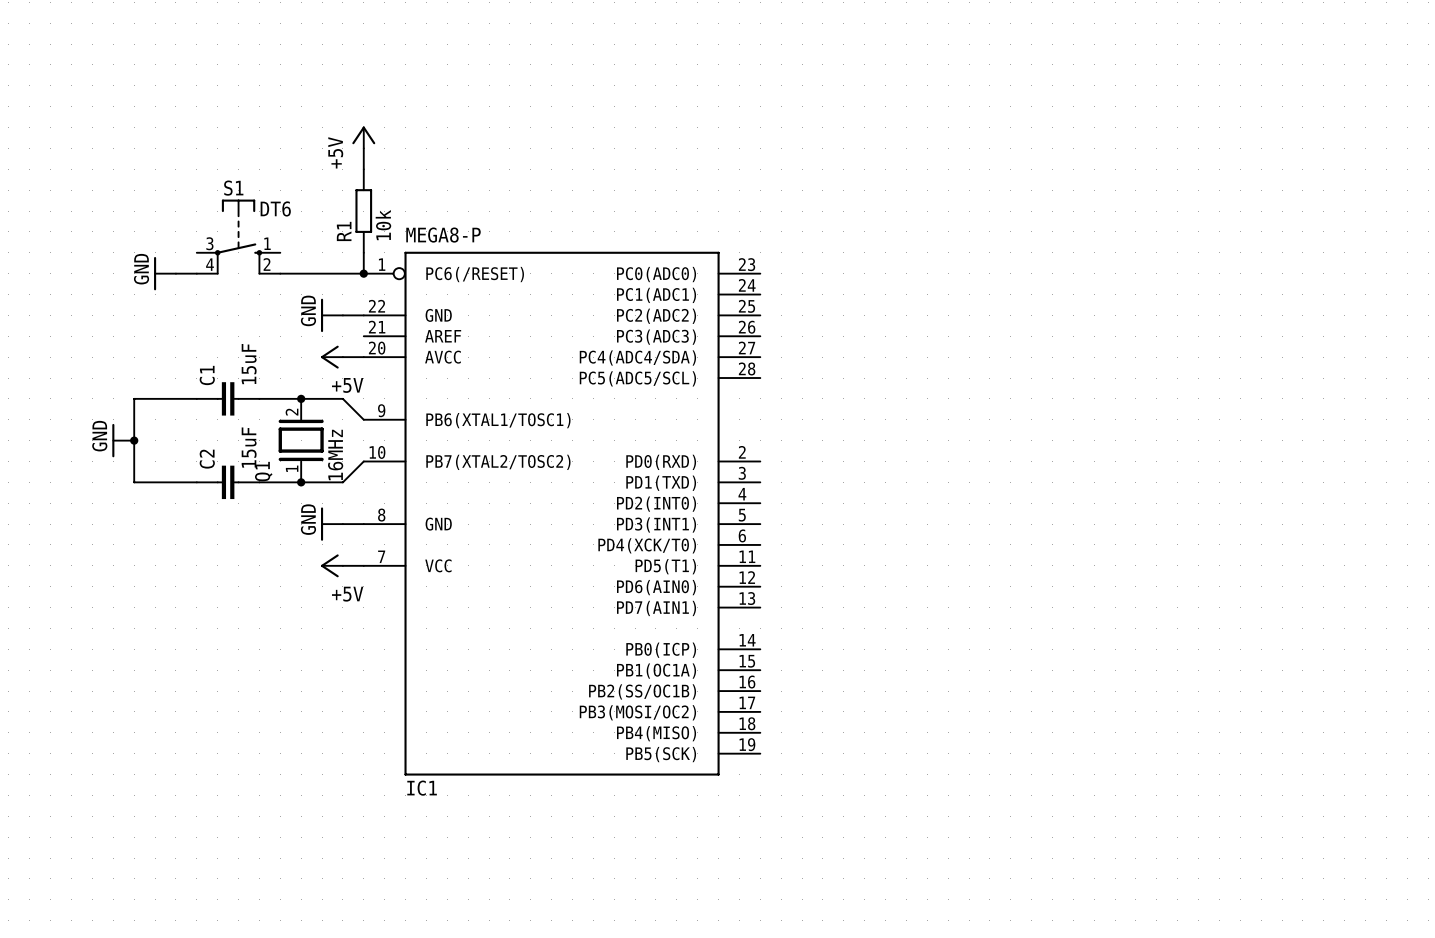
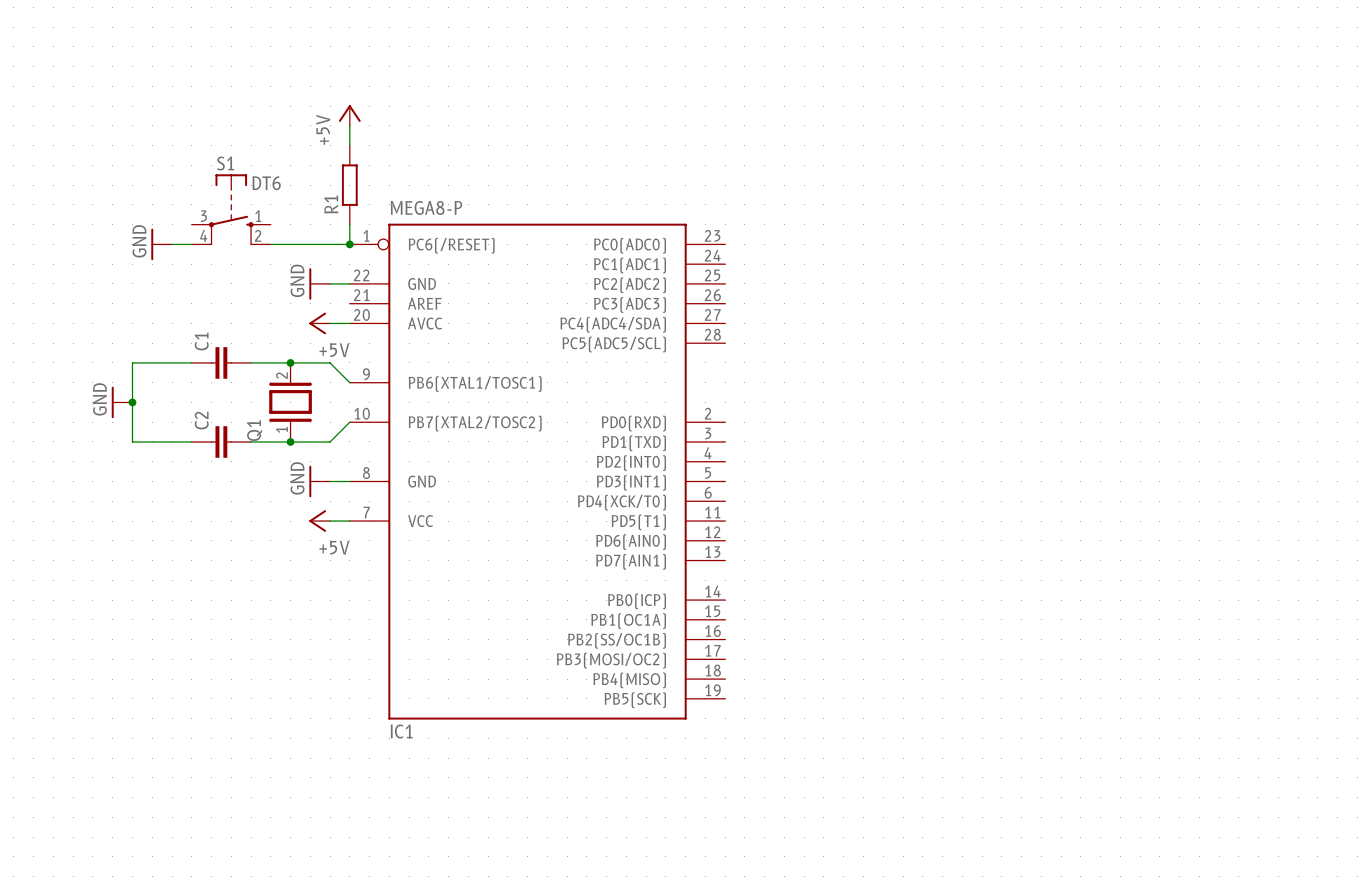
R1 value: 10k (383, 225) -> none
C1 value: 15uF (249, 364) -> none
C2 value: 15uF (249, 447) -> none
Q1 value: 16MHz (335, 454) -> none

